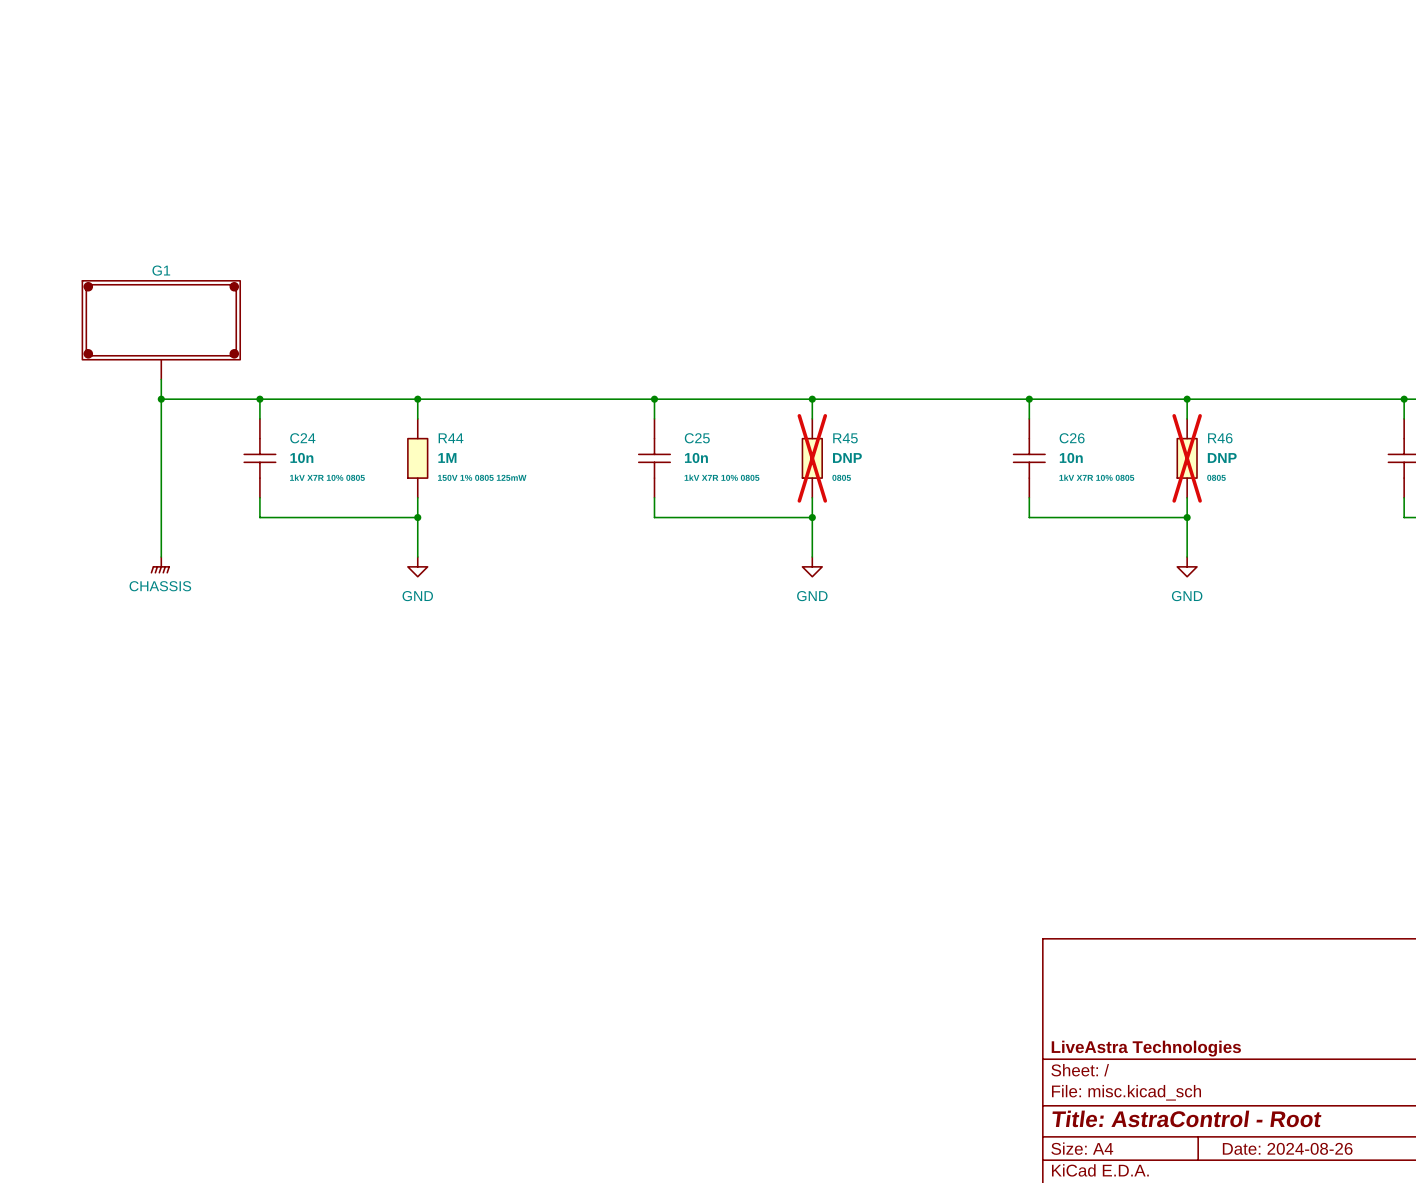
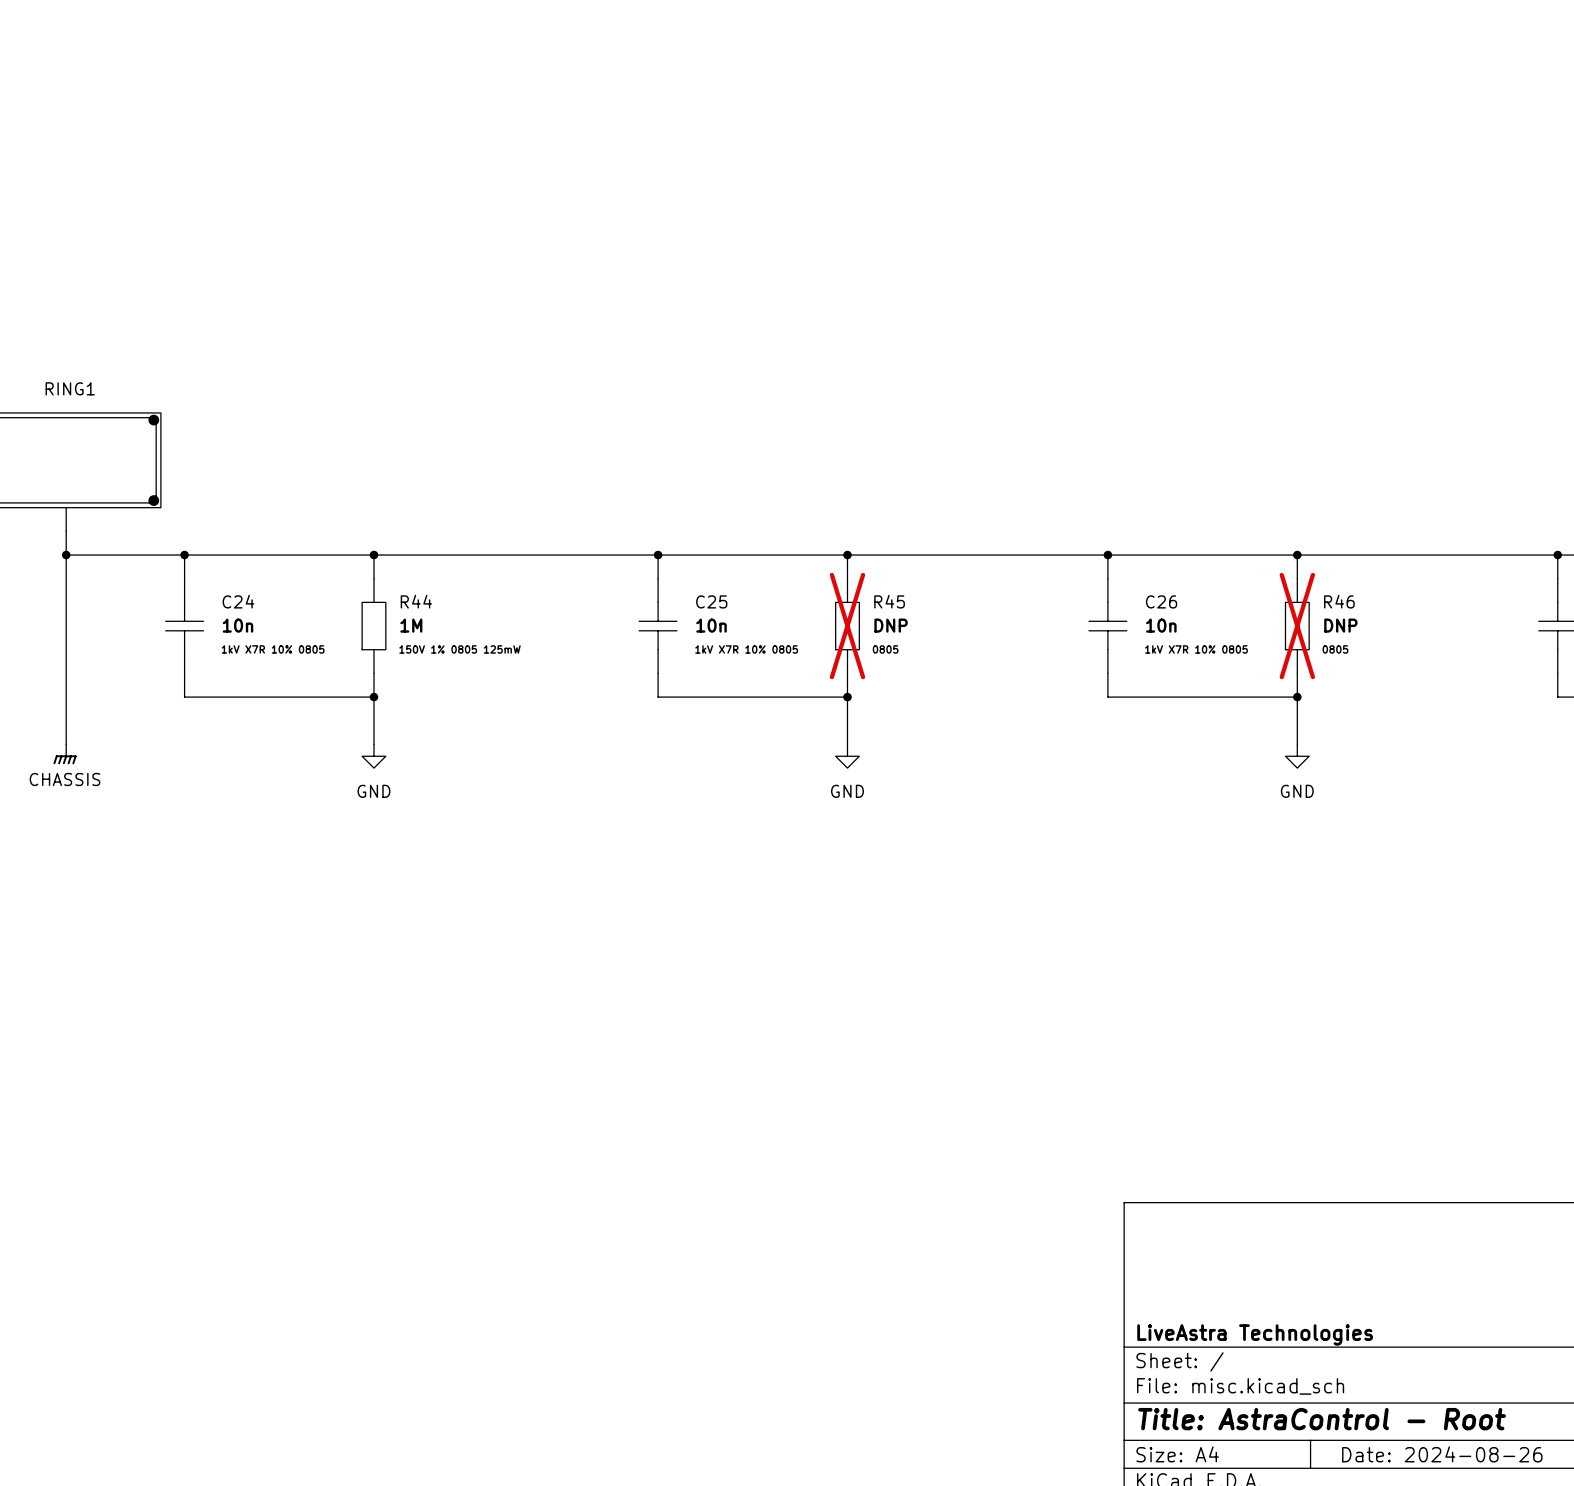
G1 name: G1 (161, 270) -> RING1 (70, 388)

